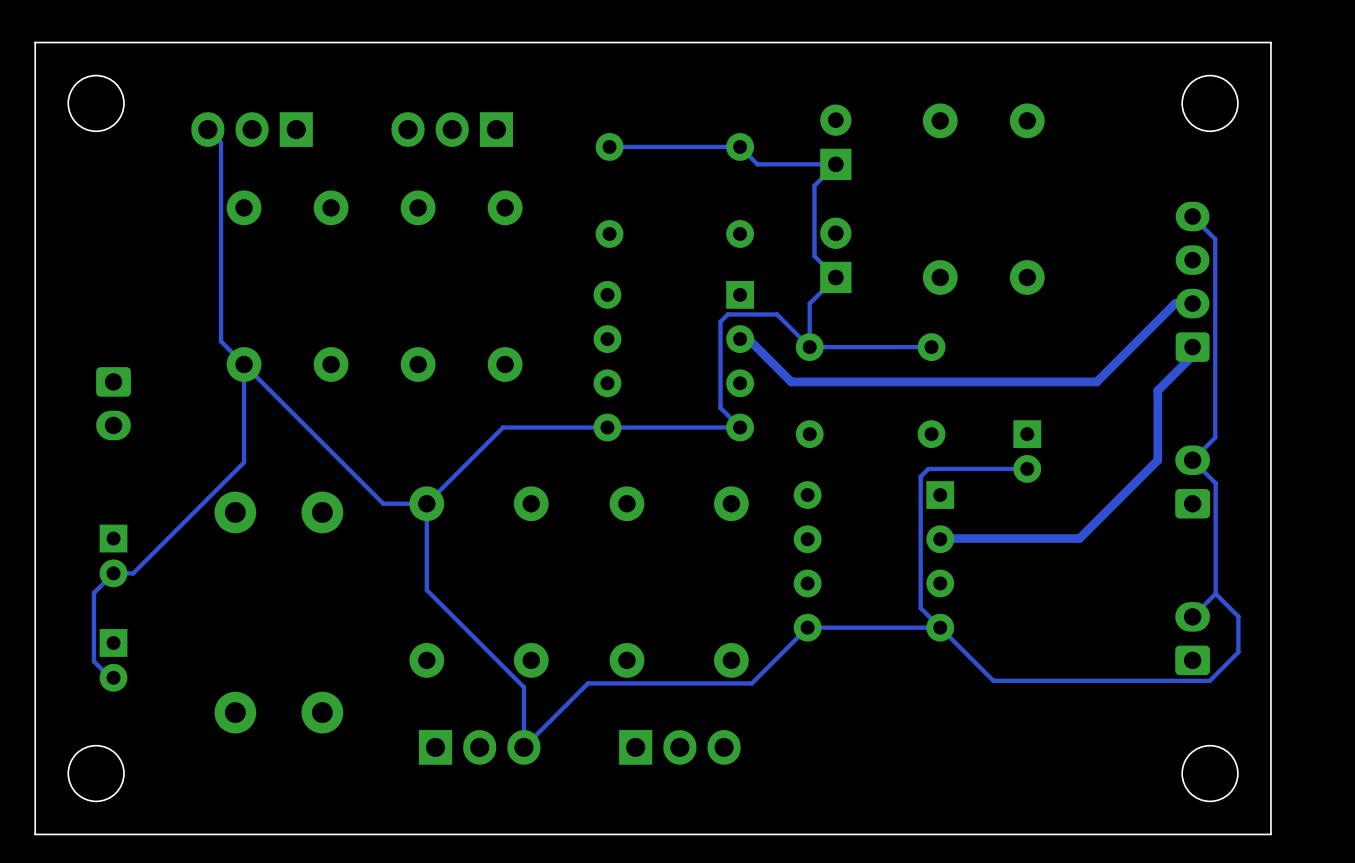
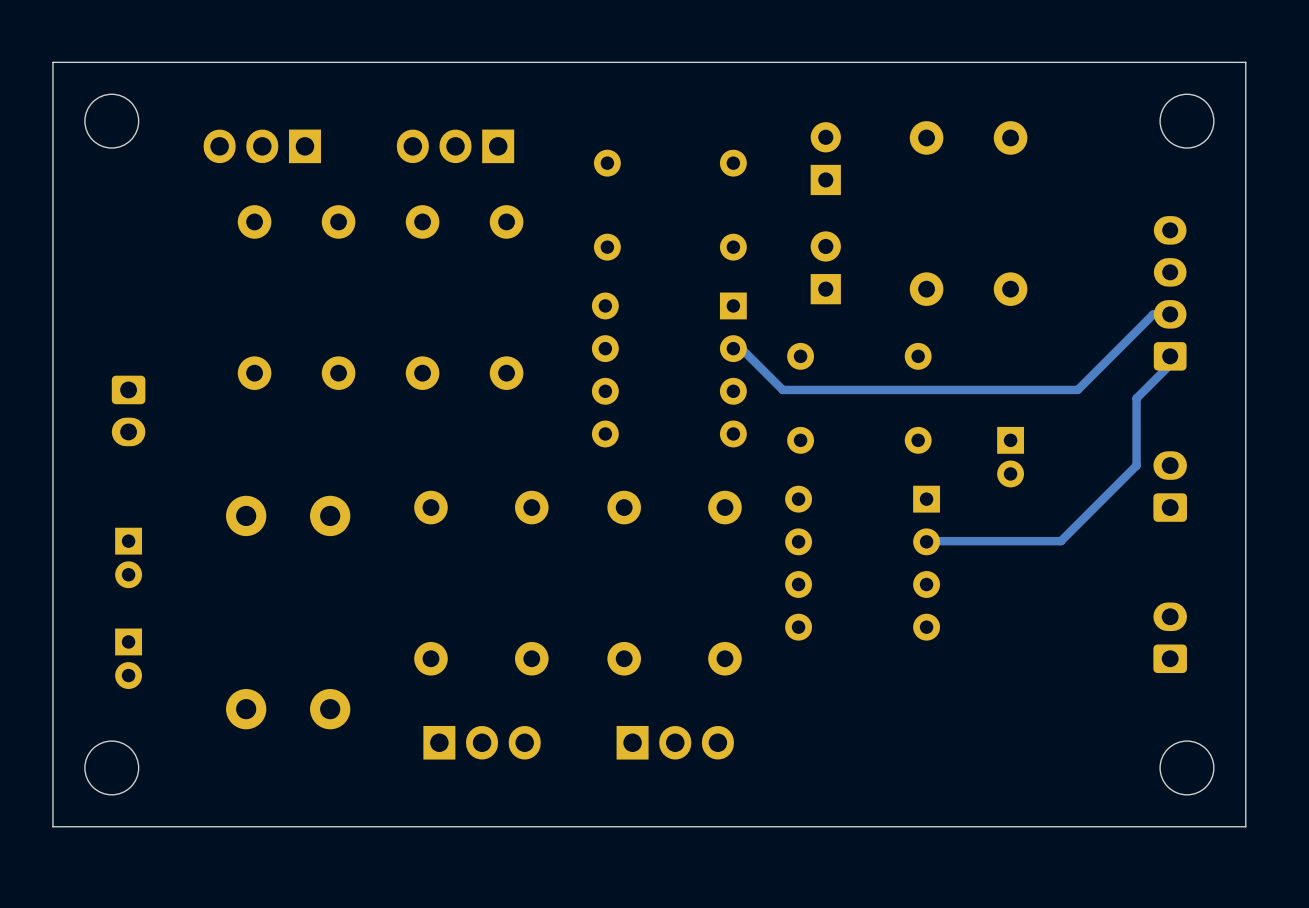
track: (207, 129) (221, 142) (221, 341) (383, 503) (426, 503) -> none
track: (609, 146) (740, 146) (757, 164) (835, 164) (814, 185) (814, 256) (835, 277) (809, 303) (809, 347) -> none
track: (1192, 216) (1215, 239) (1215, 437) (1192, 460) (1215, 483) (1215, 593) -> none
track: (809, 347) (777, 314) (727, 314) (720, 321) (720, 407) (740, 427) (503, 427) (426, 503) -> none
track: (931, 347) (809, 347) -> none
track: (244, 364) (244, 462) (133, 573) (113, 573) (93, 592) (93, 661) (110, 677) (113, 677) -> none
track: (1027, 468) (928, 468) (920, 476) (920, 608) (993, 680) (1209, 680) (1238, 652) (1238, 616) (1215, 593) -> none
track: (426, 503) (426, 590) (523, 687) (523, 747) (587, 683) (751, 683) (807, 627) (940, 627) -> none
track: (1215, 593) (1192, 616) -> none

